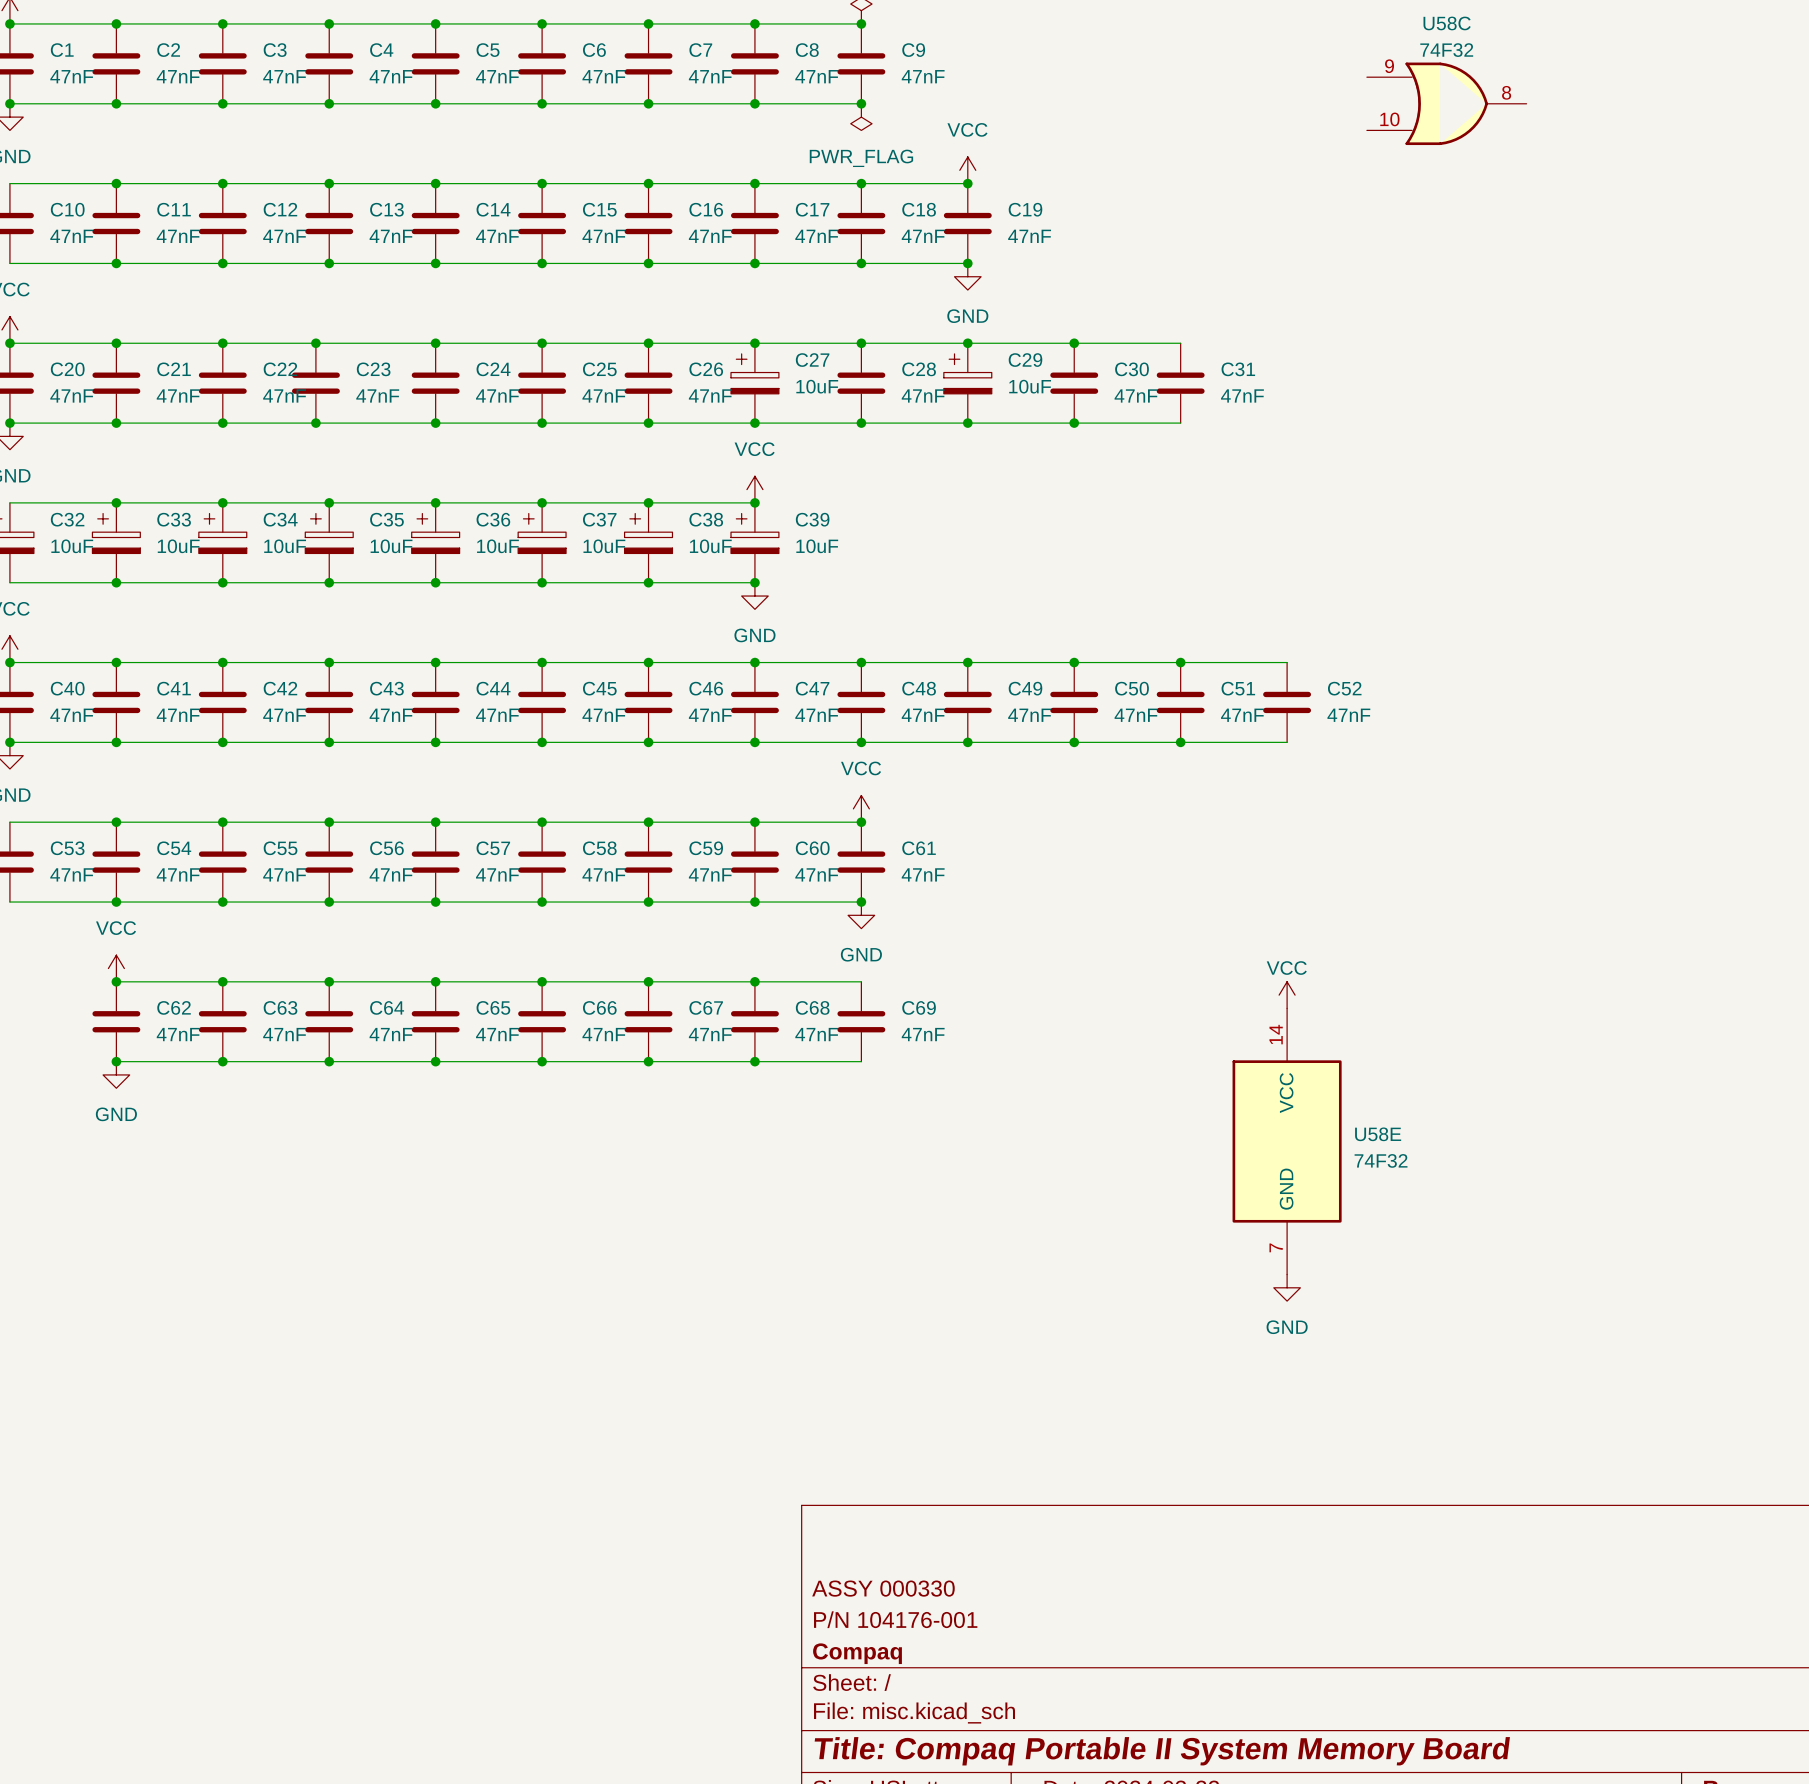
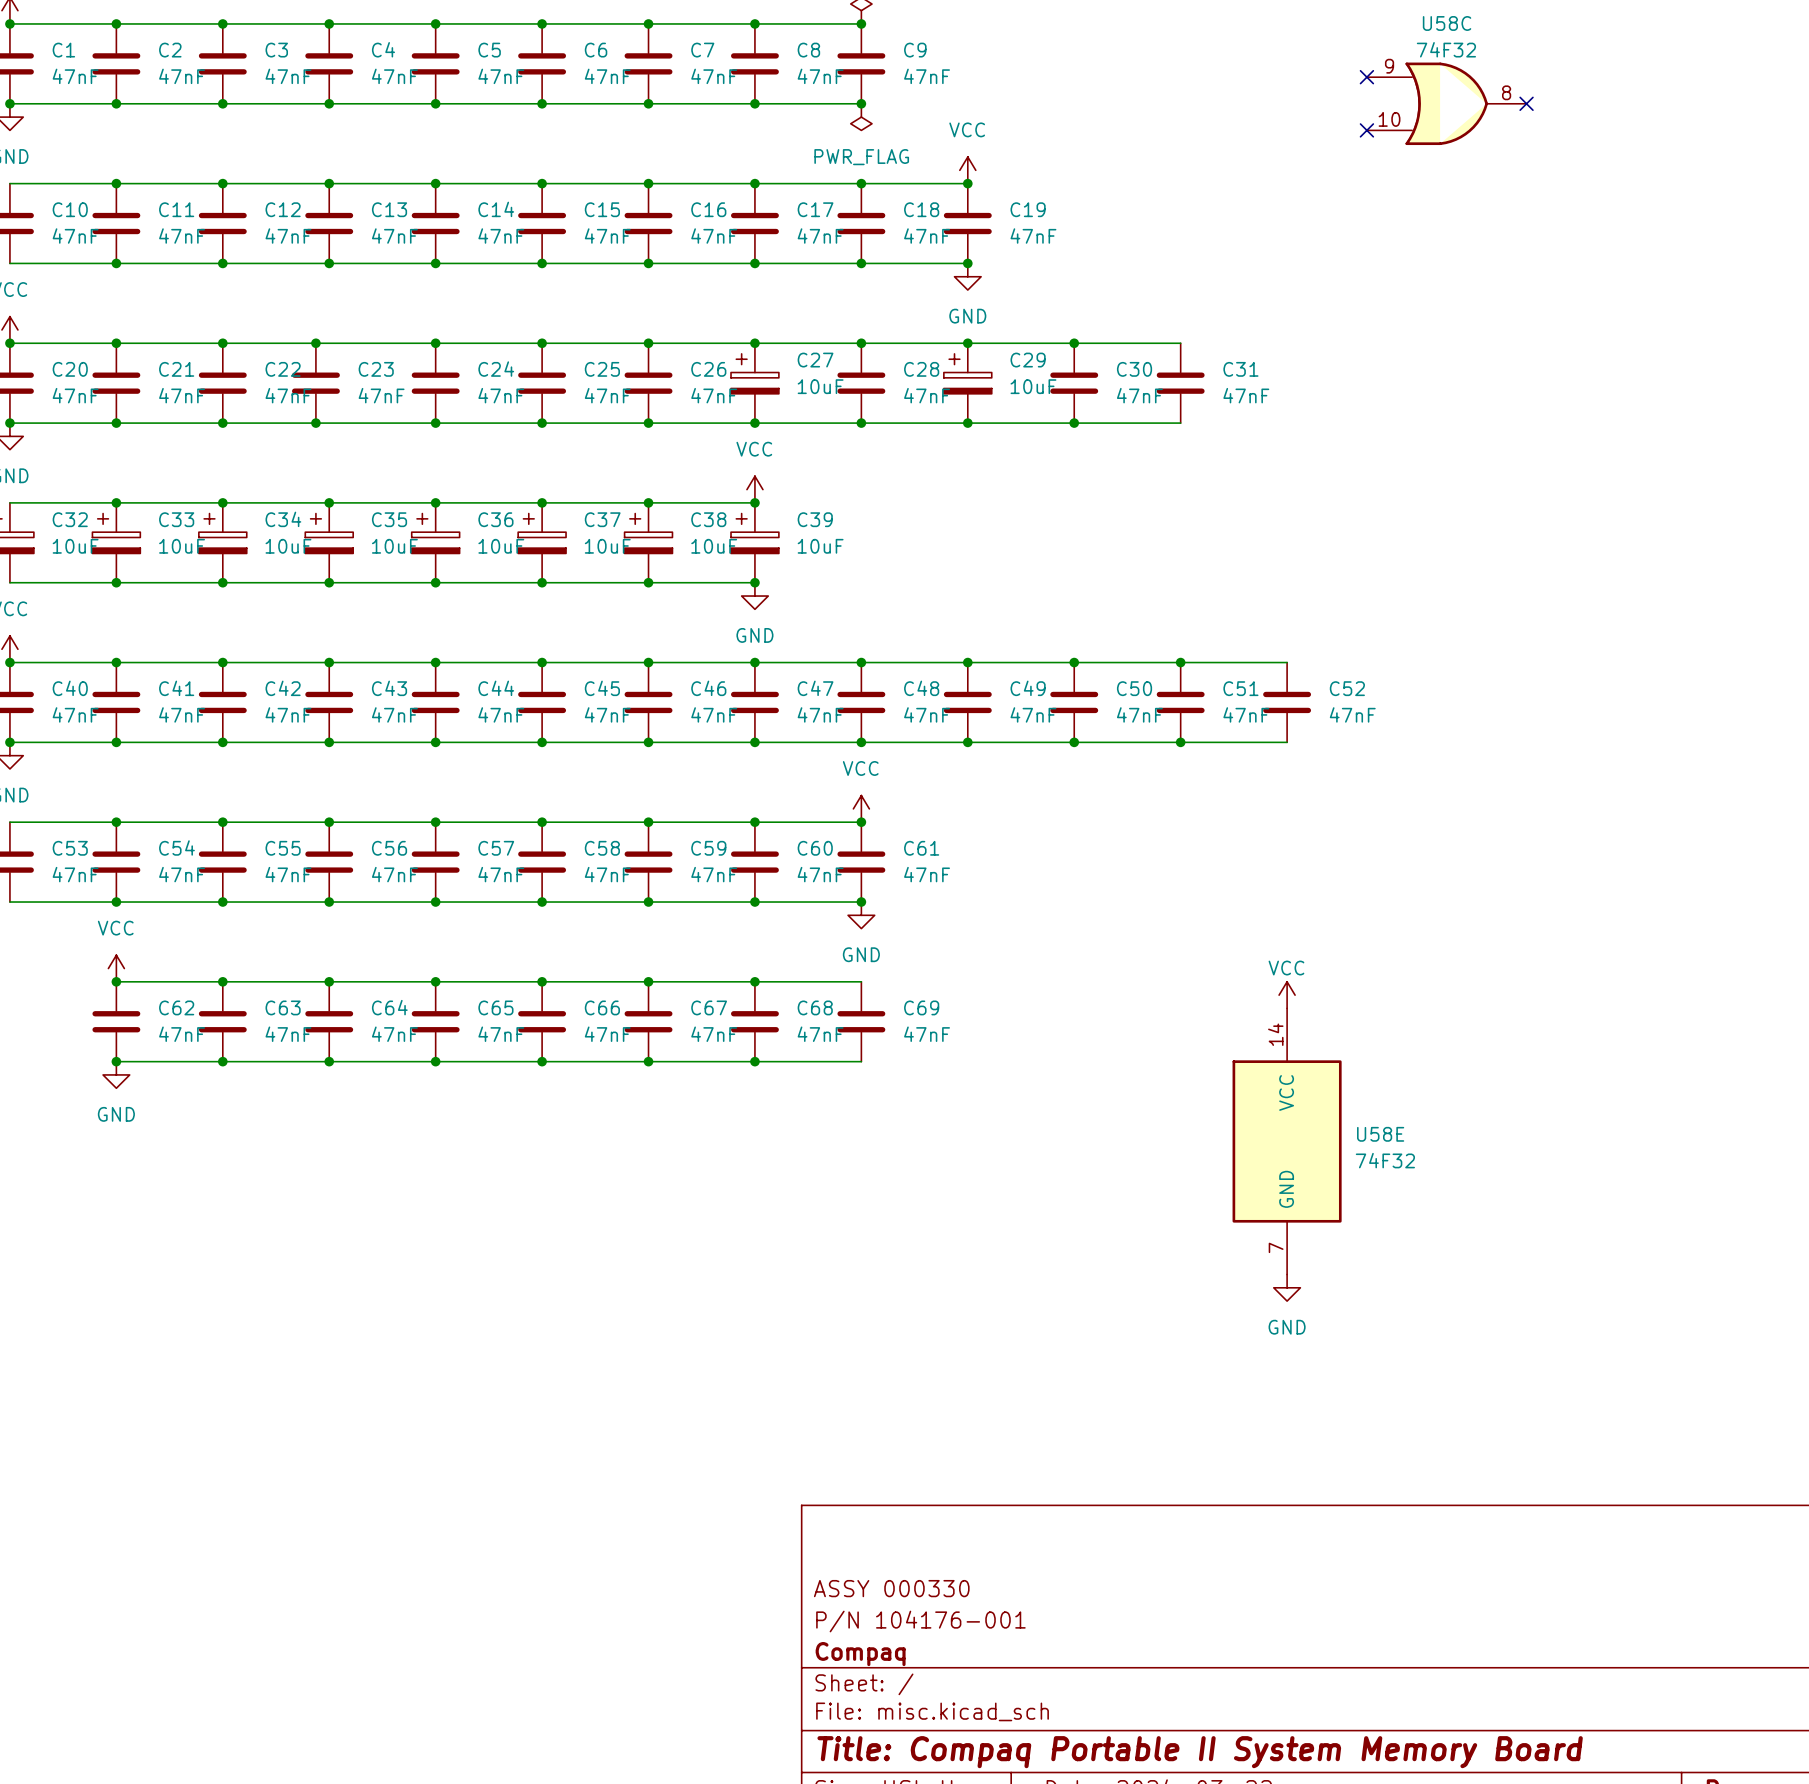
no-connect mark: none -> (1366, 77)
no-connect mark: none -> (1526, 103)
no-connect mark: none -> (1366, 130)

